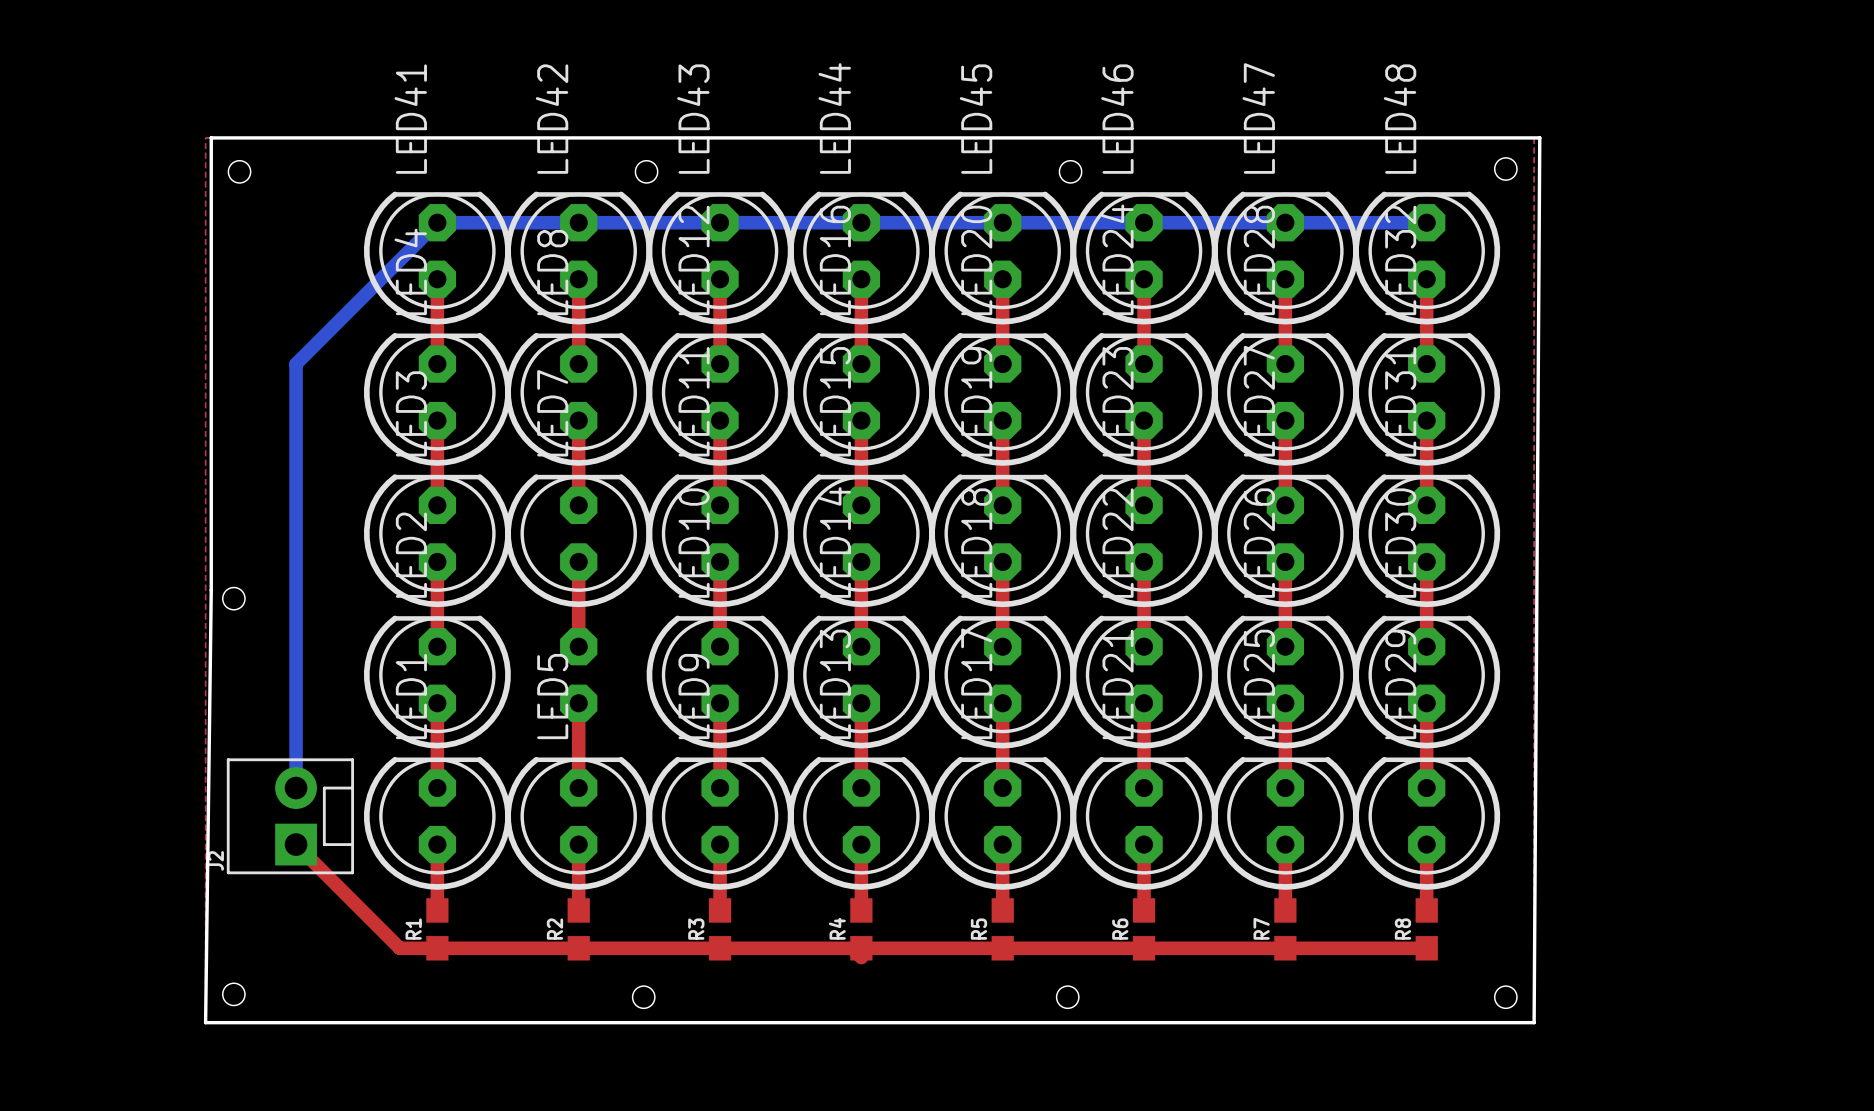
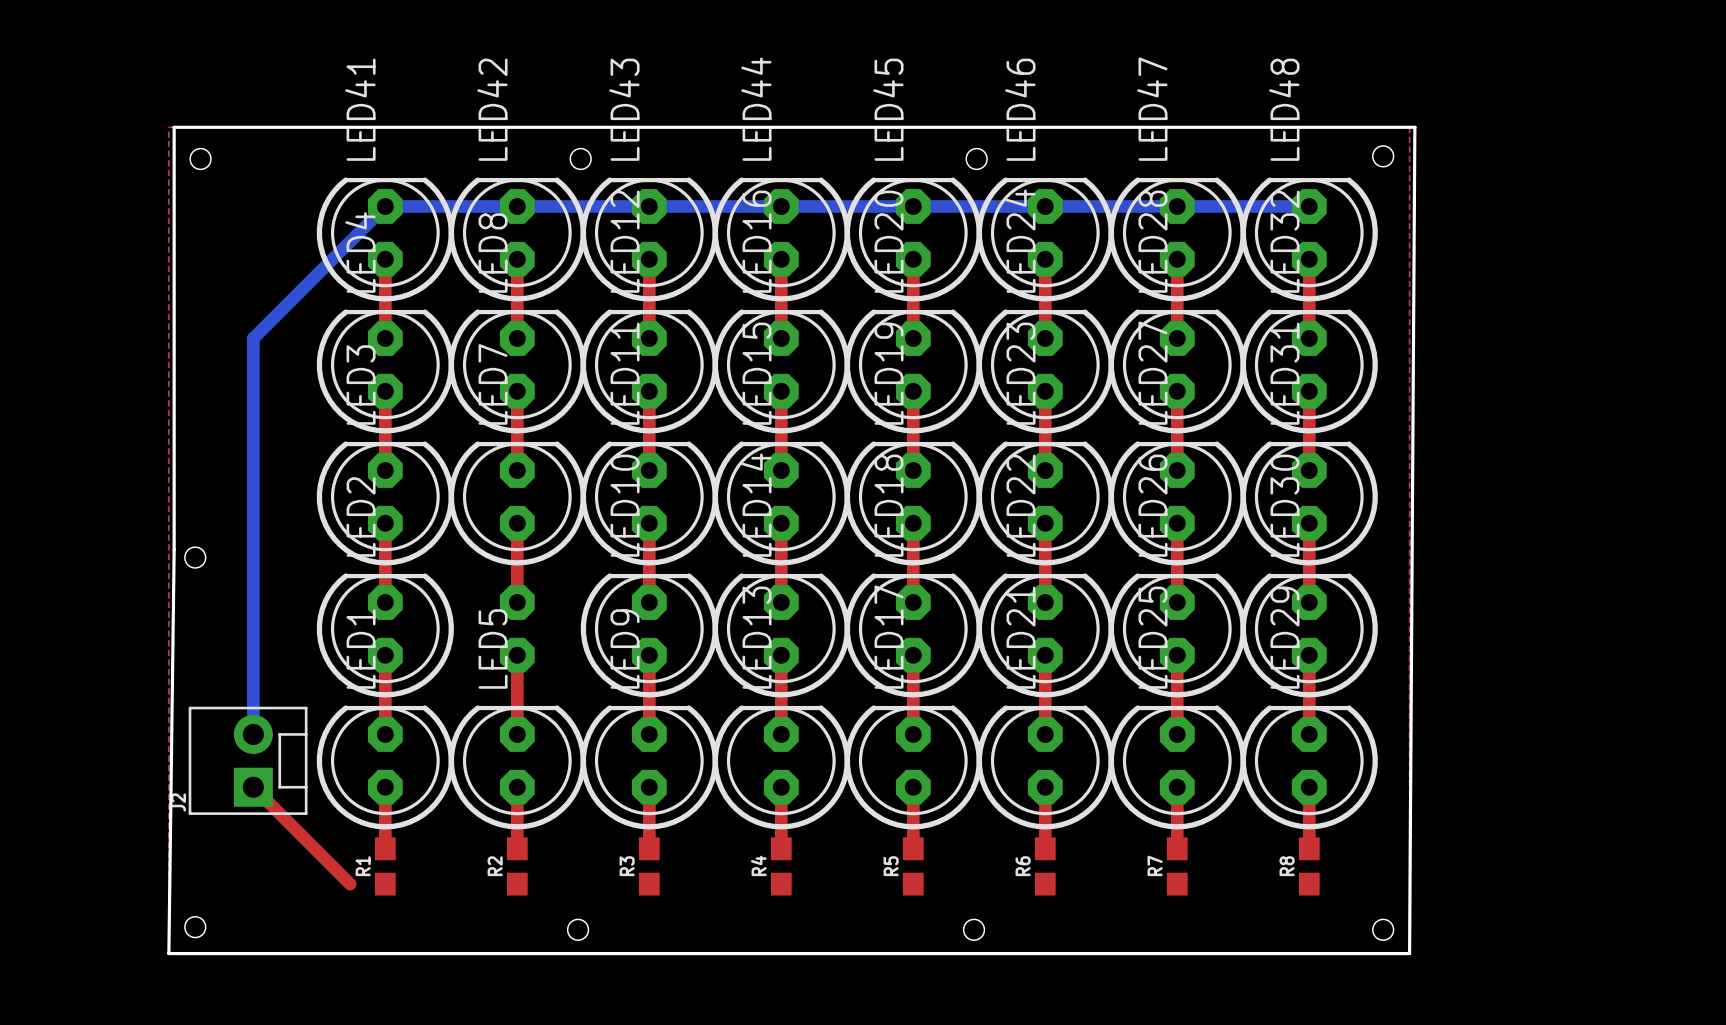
top track: (399, 948) (852, 948) (861, 957) -> none
top track: (861, 948) (1426, 948) -> none

